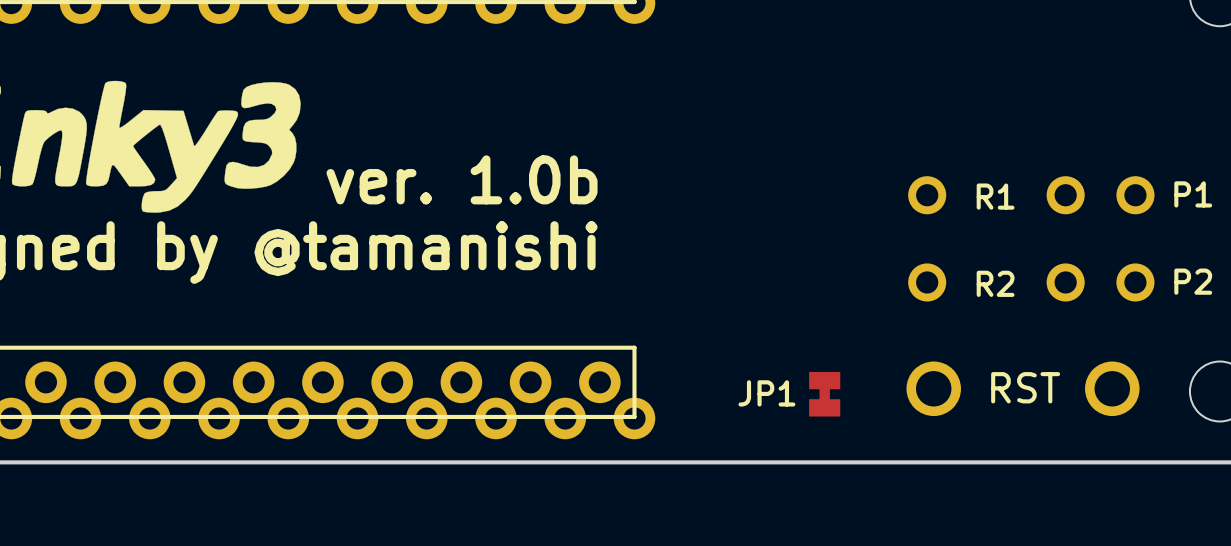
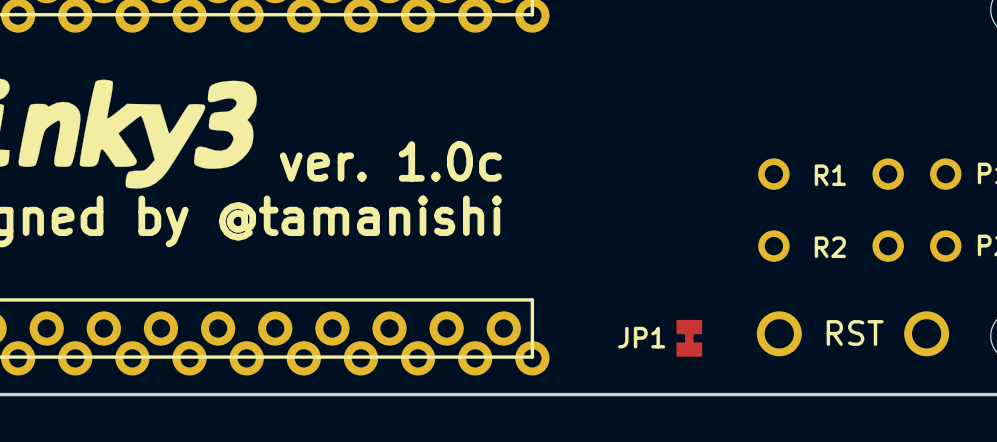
text: ver. 1.0b (462, 179) -> ver. 1.0c (390, 161)

